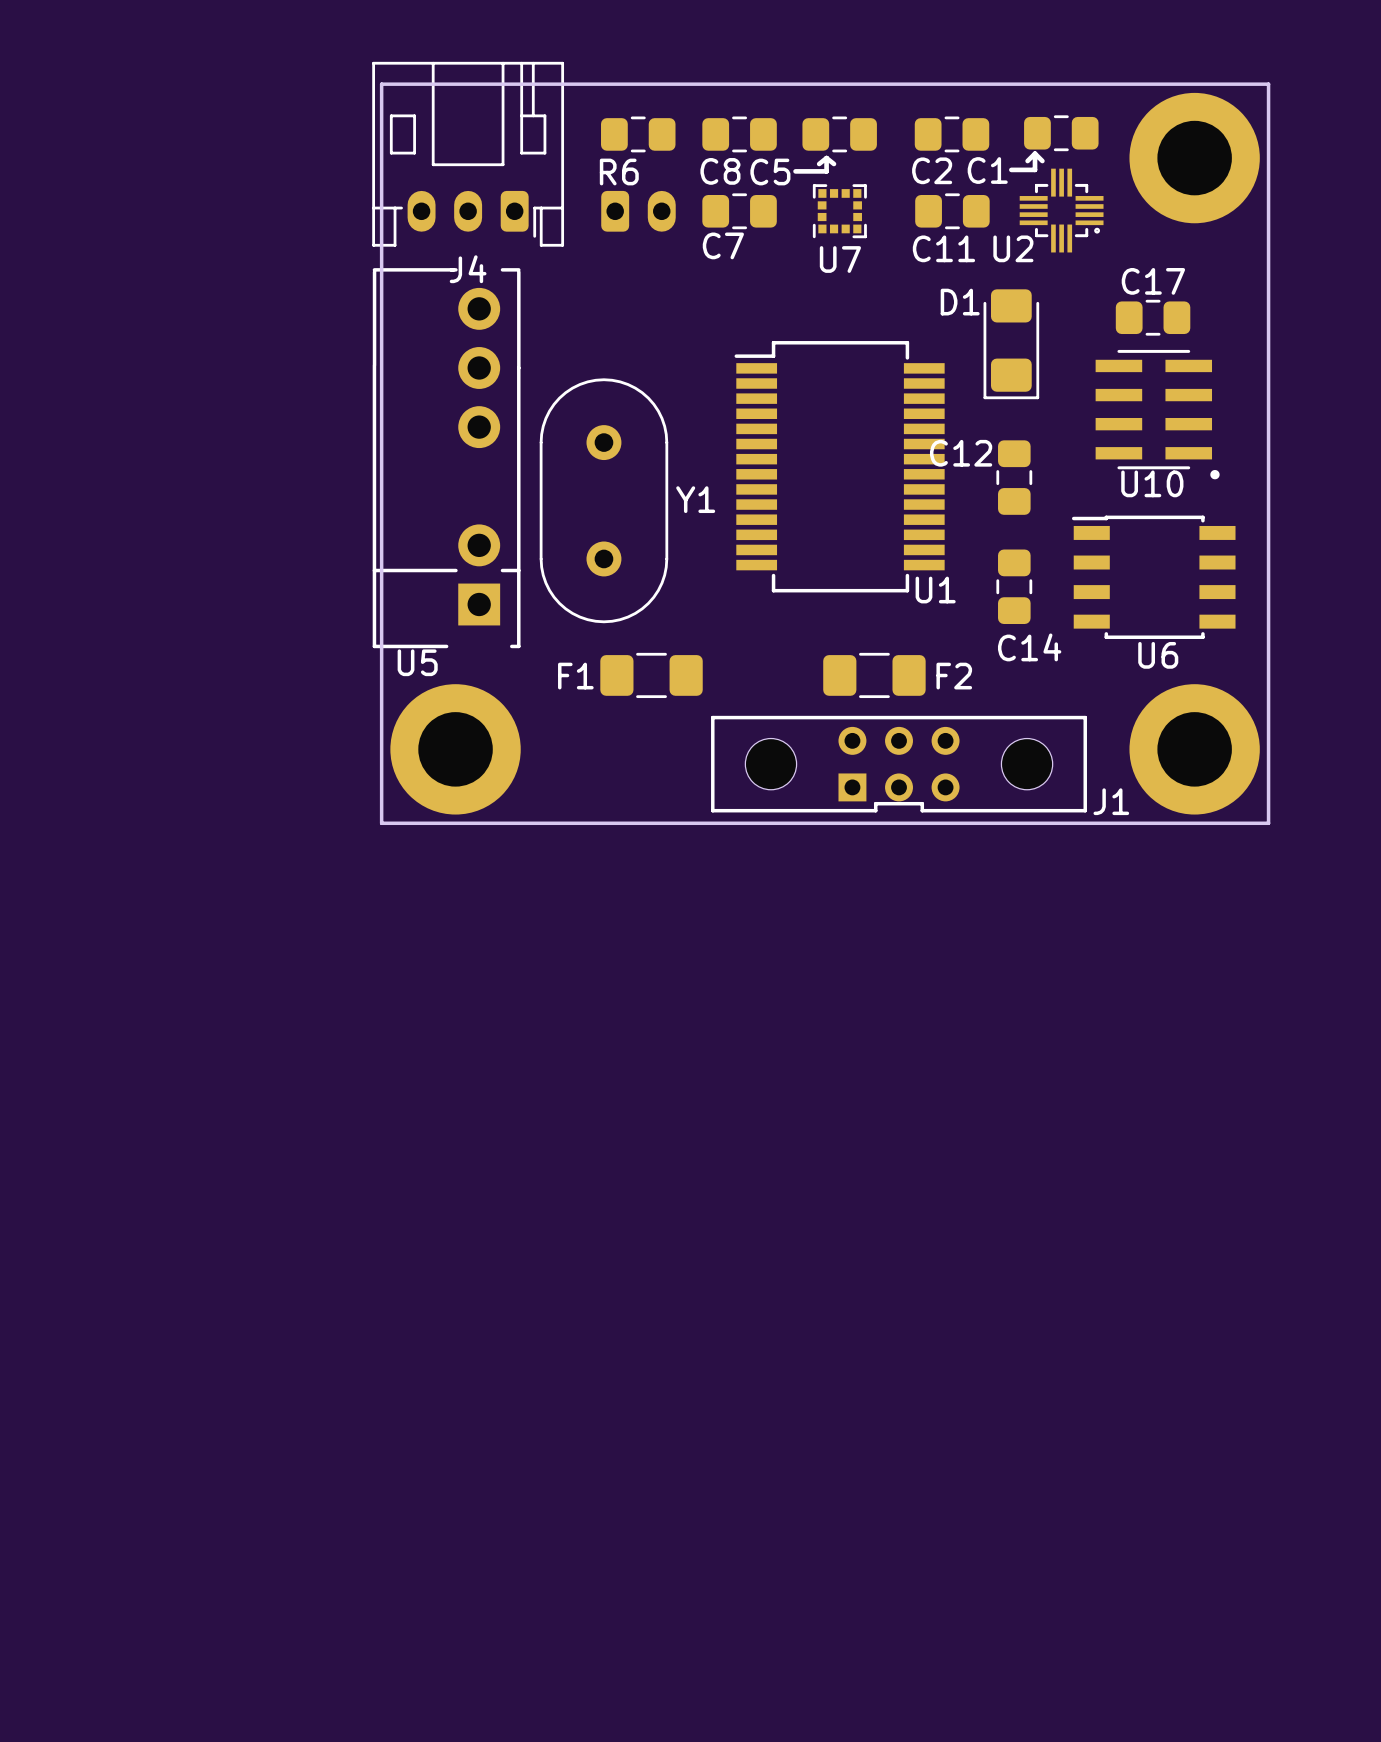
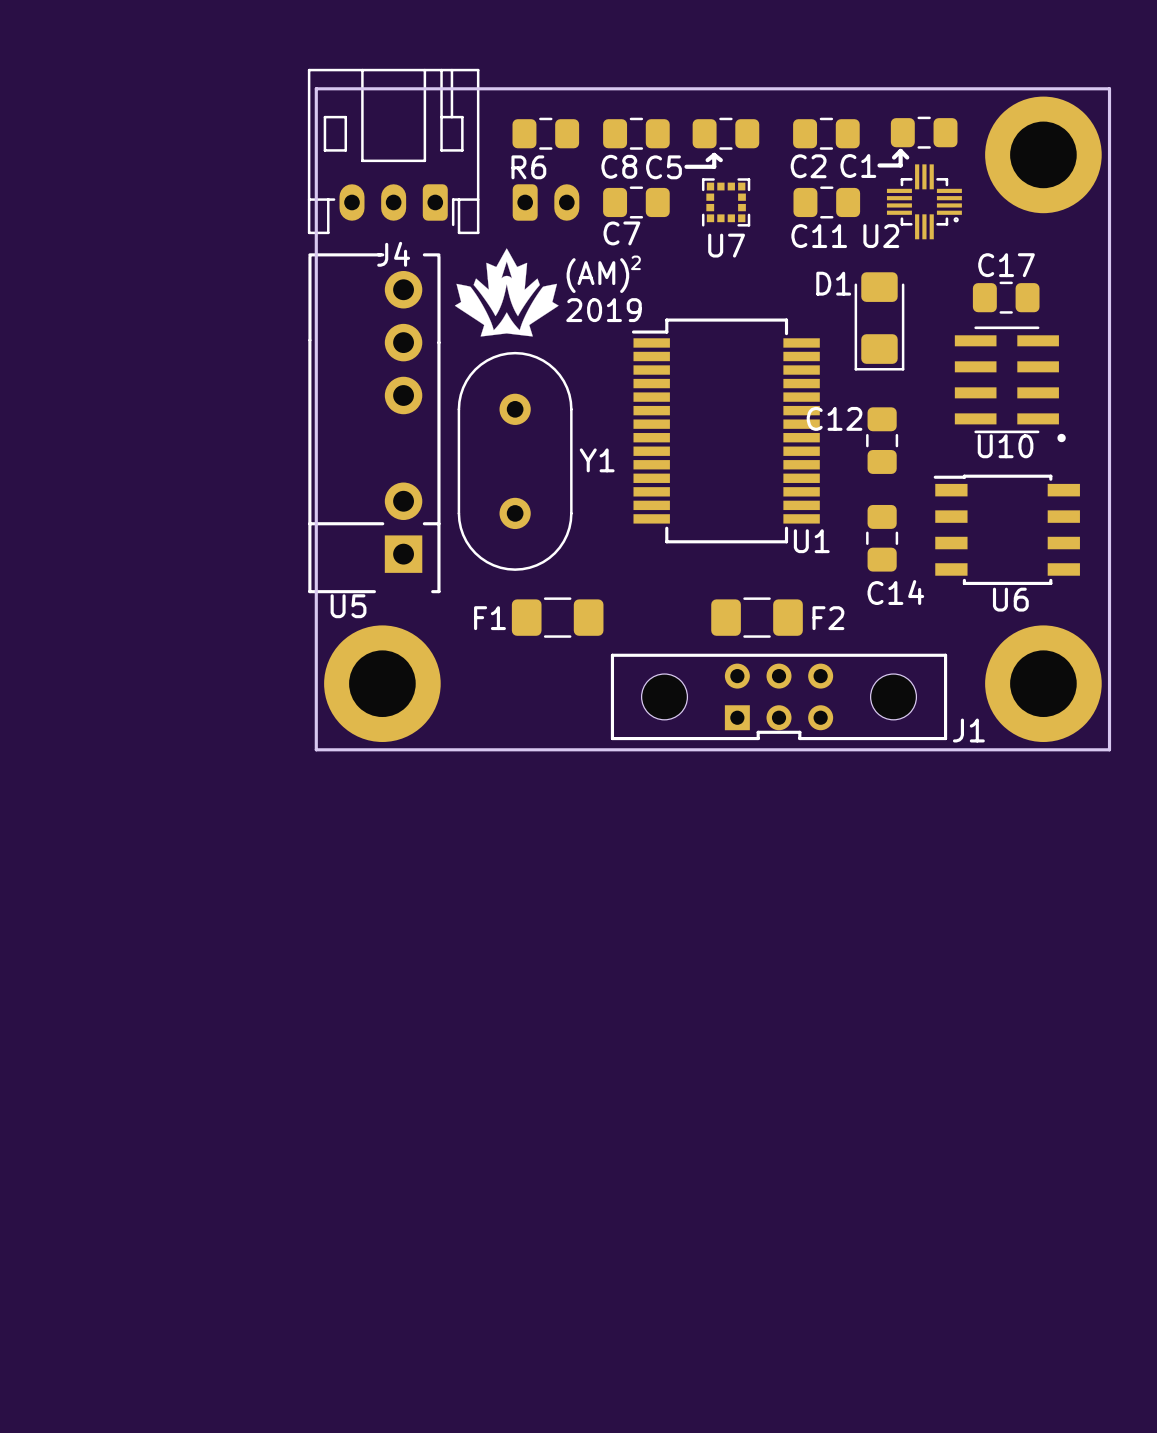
drawing: none -> [454, 248, 559, 337]
text: none -> 2 (635, 262)
text: none -> (AM) (597, 275)
text: none -> 2019 (604, 310)

